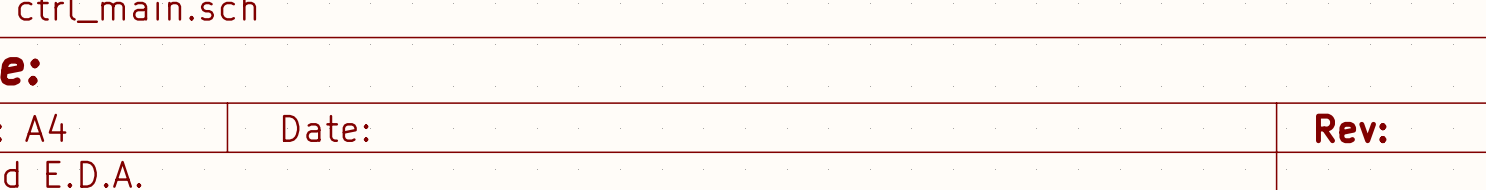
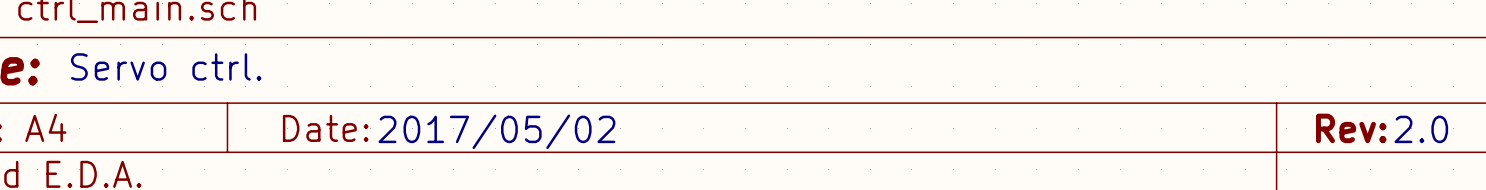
text: none -> Servo ctrl. (166, 66)
text: none -> 2.0 (1421, 129)
text: none -> 2017/05/02 (496, 131)

